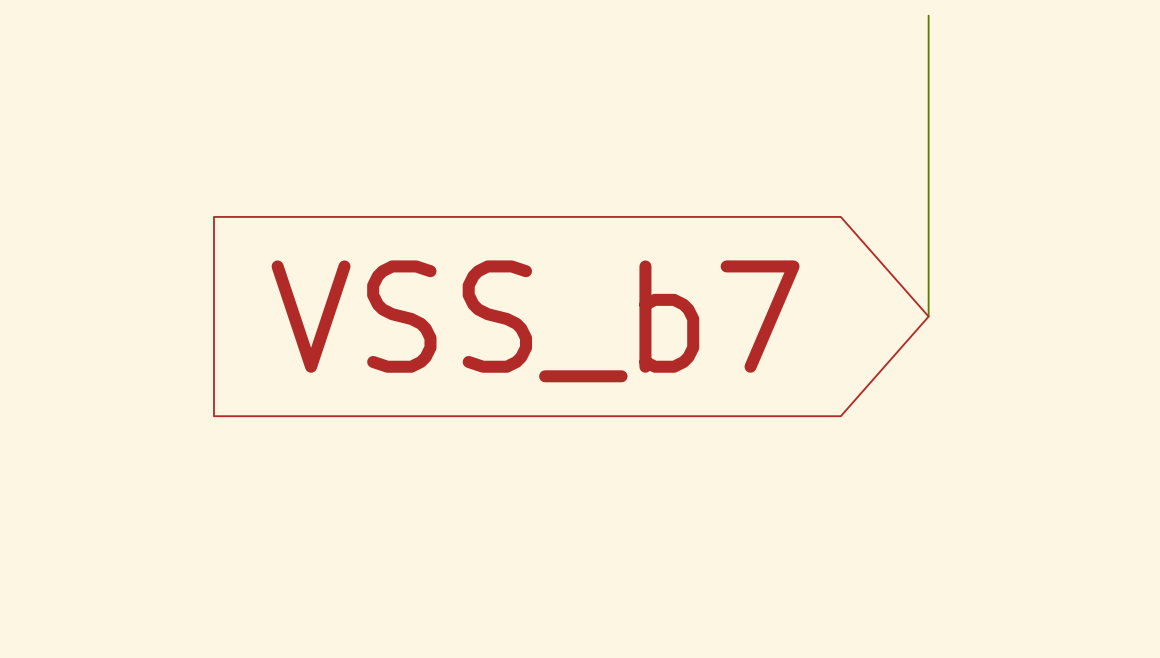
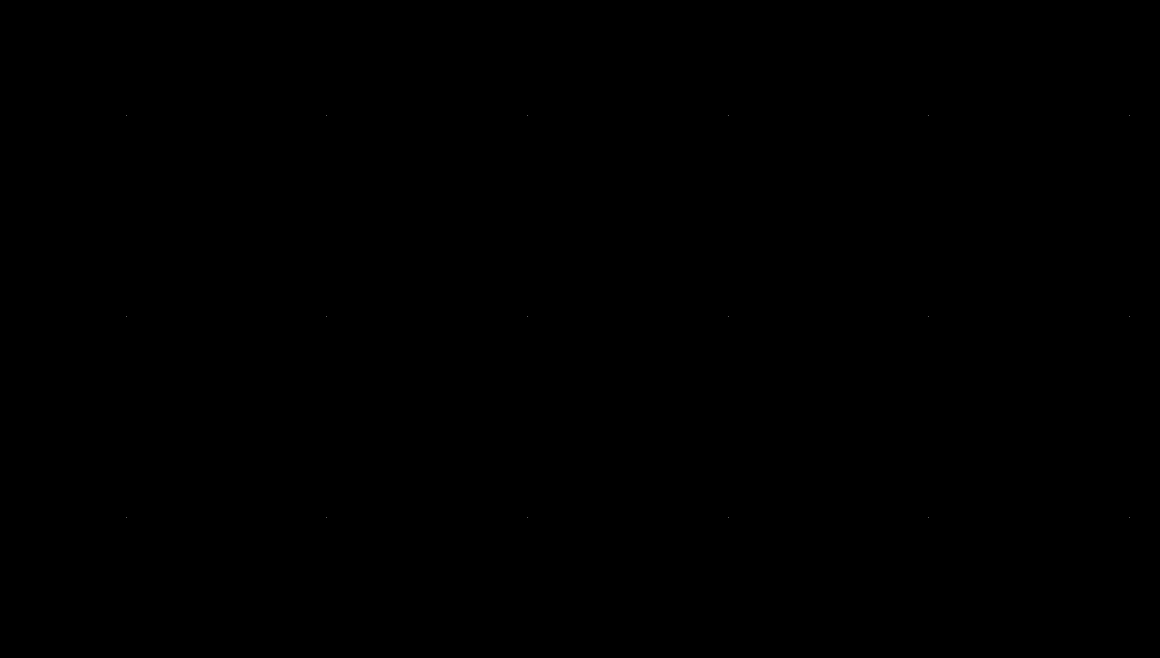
wire: (928, 15) (928, 316) -> none
global label: VSS_b7 (535, 321) -> none

